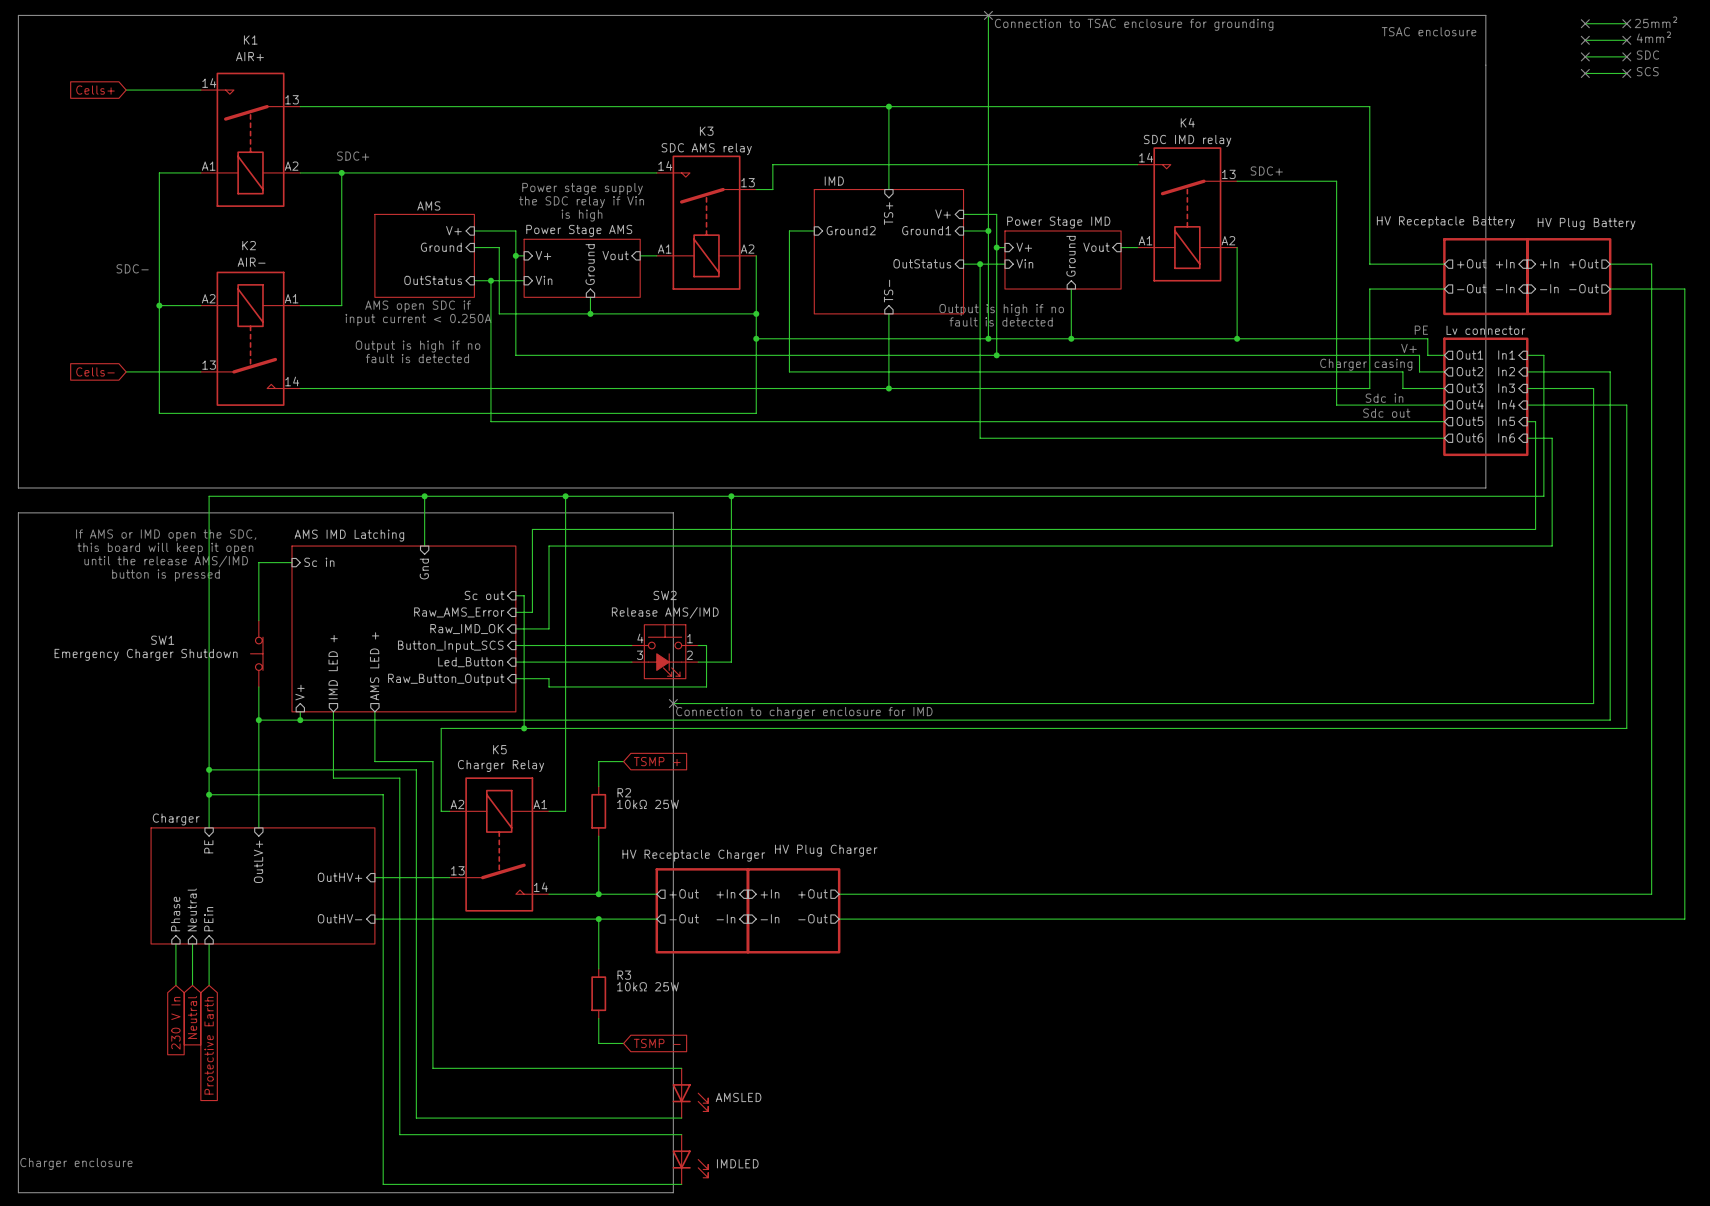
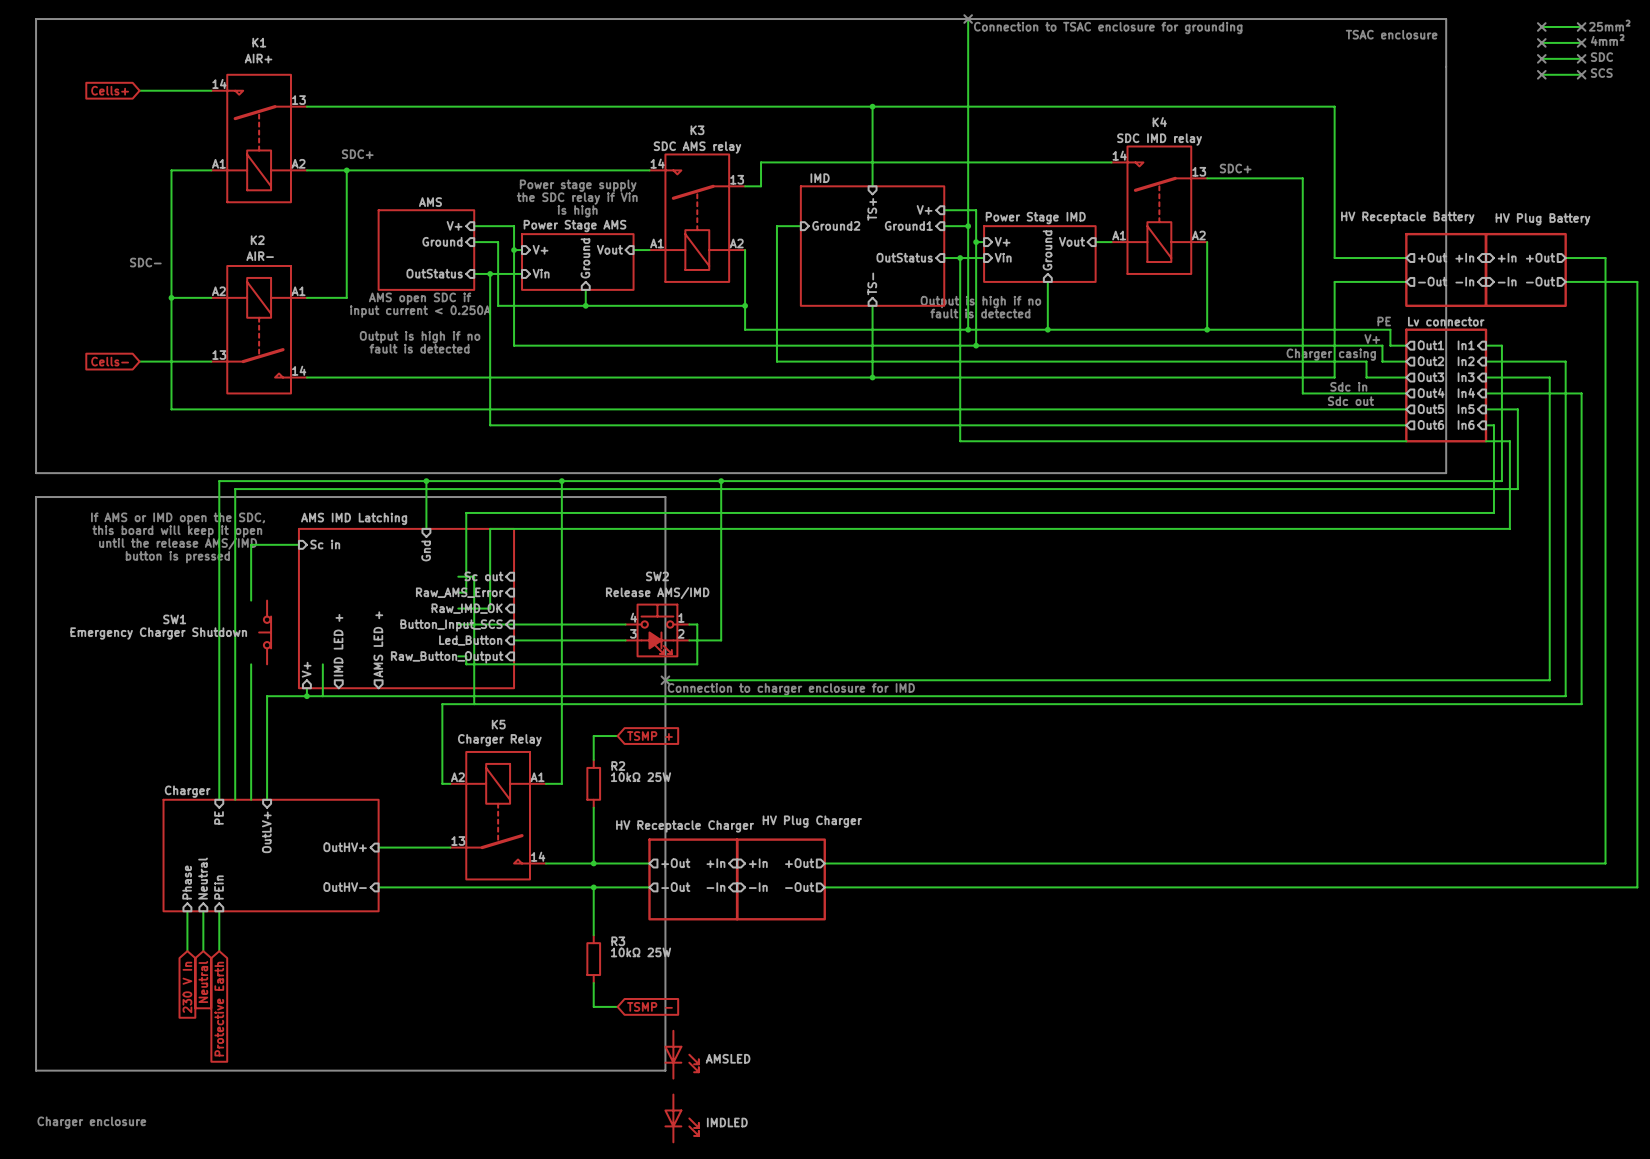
wire: (756, 338) (756, 413) (159, 413) -> (1406, 441) (960, 441) (960, 425) (490, 425) (490, 409) (171, 409) (171, 401)
junction: (756, 338) -> none
wire: (1535, 421) (1535, 438) (1552, 438) (1552, 454) -> (1486, 441) (1509, 441)
wire: none -> (1493, 409) (1517, 409) (1517, 489) (235, 489) (235, 799)
wire: (532, 529) (532, 612) (515, 612) -> (529, 512) (466, 512) (466, 592) (458, 592)
wire: (549, 546) (549, 628) (515, 628) -> (545, 528) (490, 528) (490, 608) (458, 608)
wire: (258, 562) (258, 620) -> (267, 544) (251, 544) (251, 600)
wire: none -> (458, 576) (474, 576) (474, 704)
wire: (515, 595) (524, 595) (524, 728) -> none
wire: none -> (458, 624) (514, 624)
wire: (515, 678) (549, 678) (549, 686) -> (458, 656) (466, 656) (466, 664) (545, 664)
wire: none -> (251, 664) (251, 799)
wire: (258, 686) (258, 720) -> (322, 664) (322, 696)
wire: (333, 711) (333, 778) (399, 778) (399, 1134) (681, 1134) -> none
wire: (374, 711) (374, 761) (432, 761) (432, 1068) (681, 1068) -> none
junction: (258, 720) -> none
junction: (524, 728) -> none
wire: (209, 769) (416, 769) (416, 1118) (681, 1118) -> none
junction: (209, 769) -> none
wire: (209, 794) (383, 794) (383, 1184) (681, 1184) -> none
junction: (209, 794) -> none
line: (18, 1109) (18, 1192) (673, 1192) (673, 1109) -> (36, 1070) (665, 1070)

